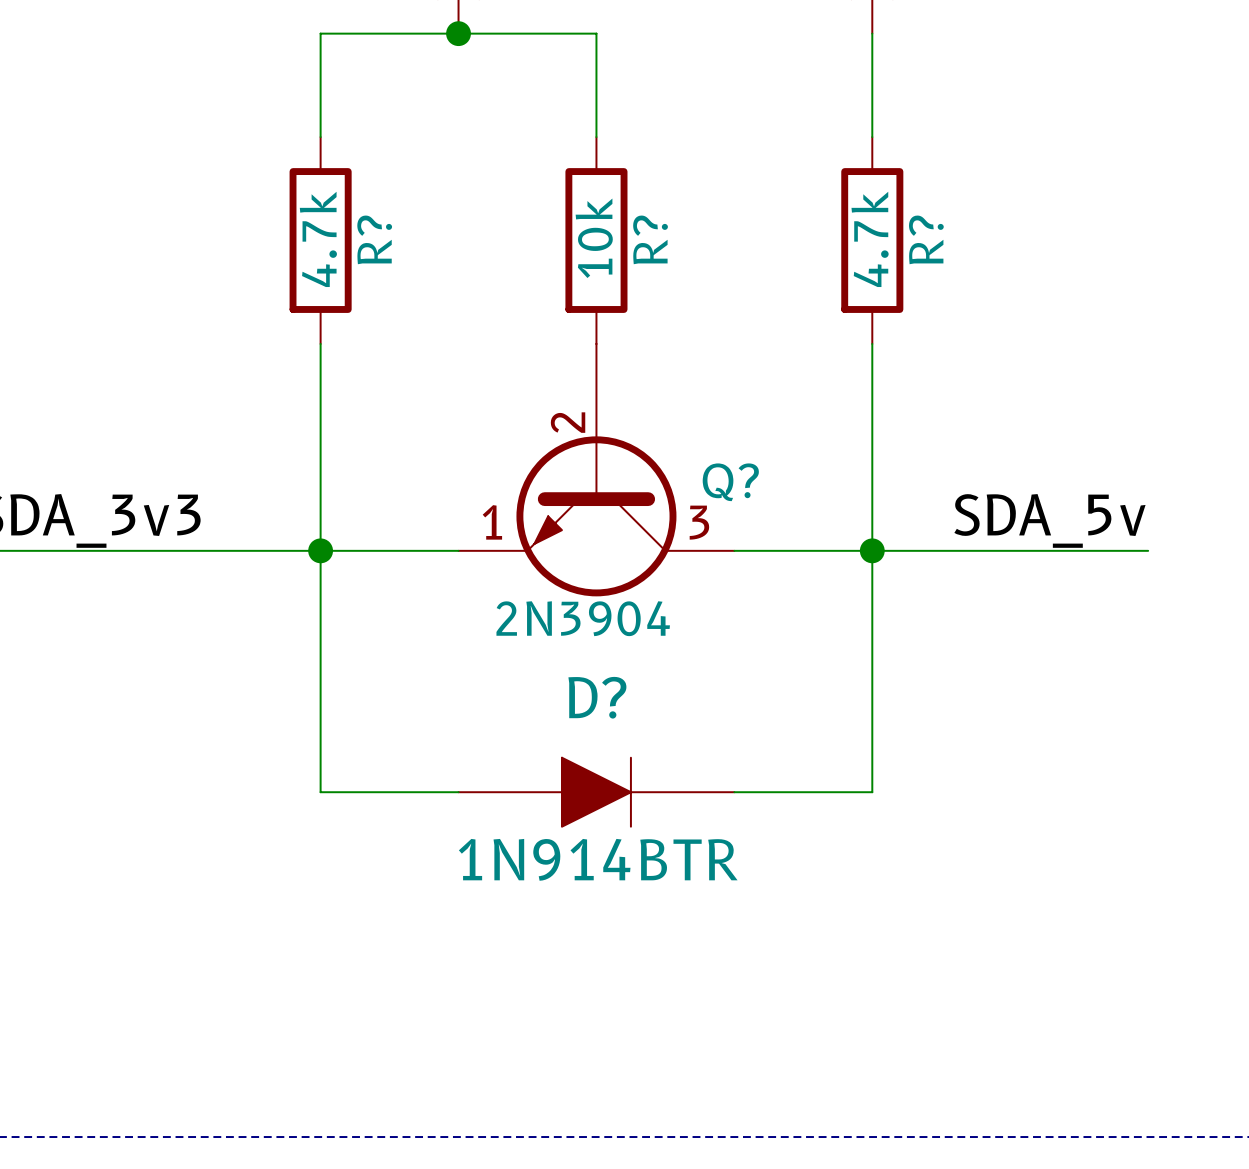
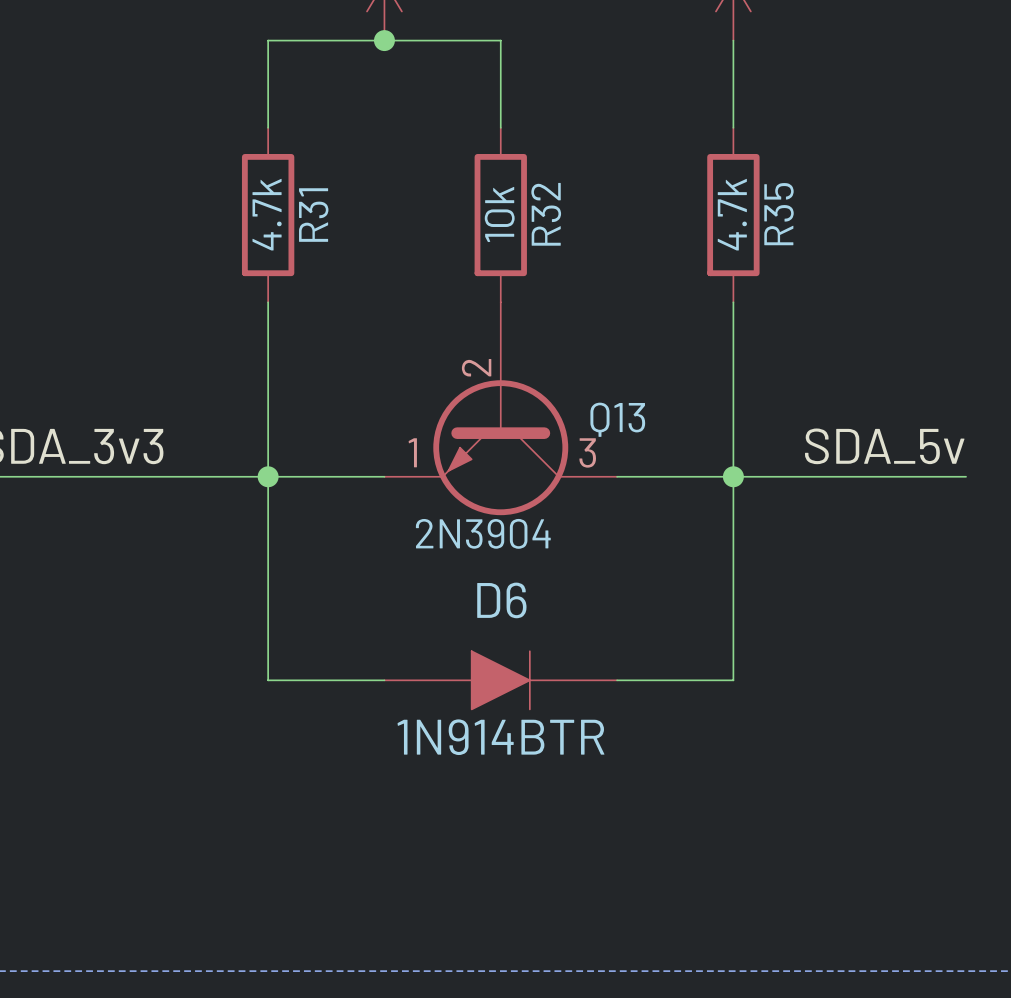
R? name: R? (374, 239) -> R31 (313, 215)
R? name: R? (650, 239) -> R32 (546, 214)
R? name: R? (926, 239) -> R35 (779, 214)
Q? name: Q? (730, 482) -> Q13 (617, 419)
D? name: D? (597, 697) -> D6 (501, 600)

